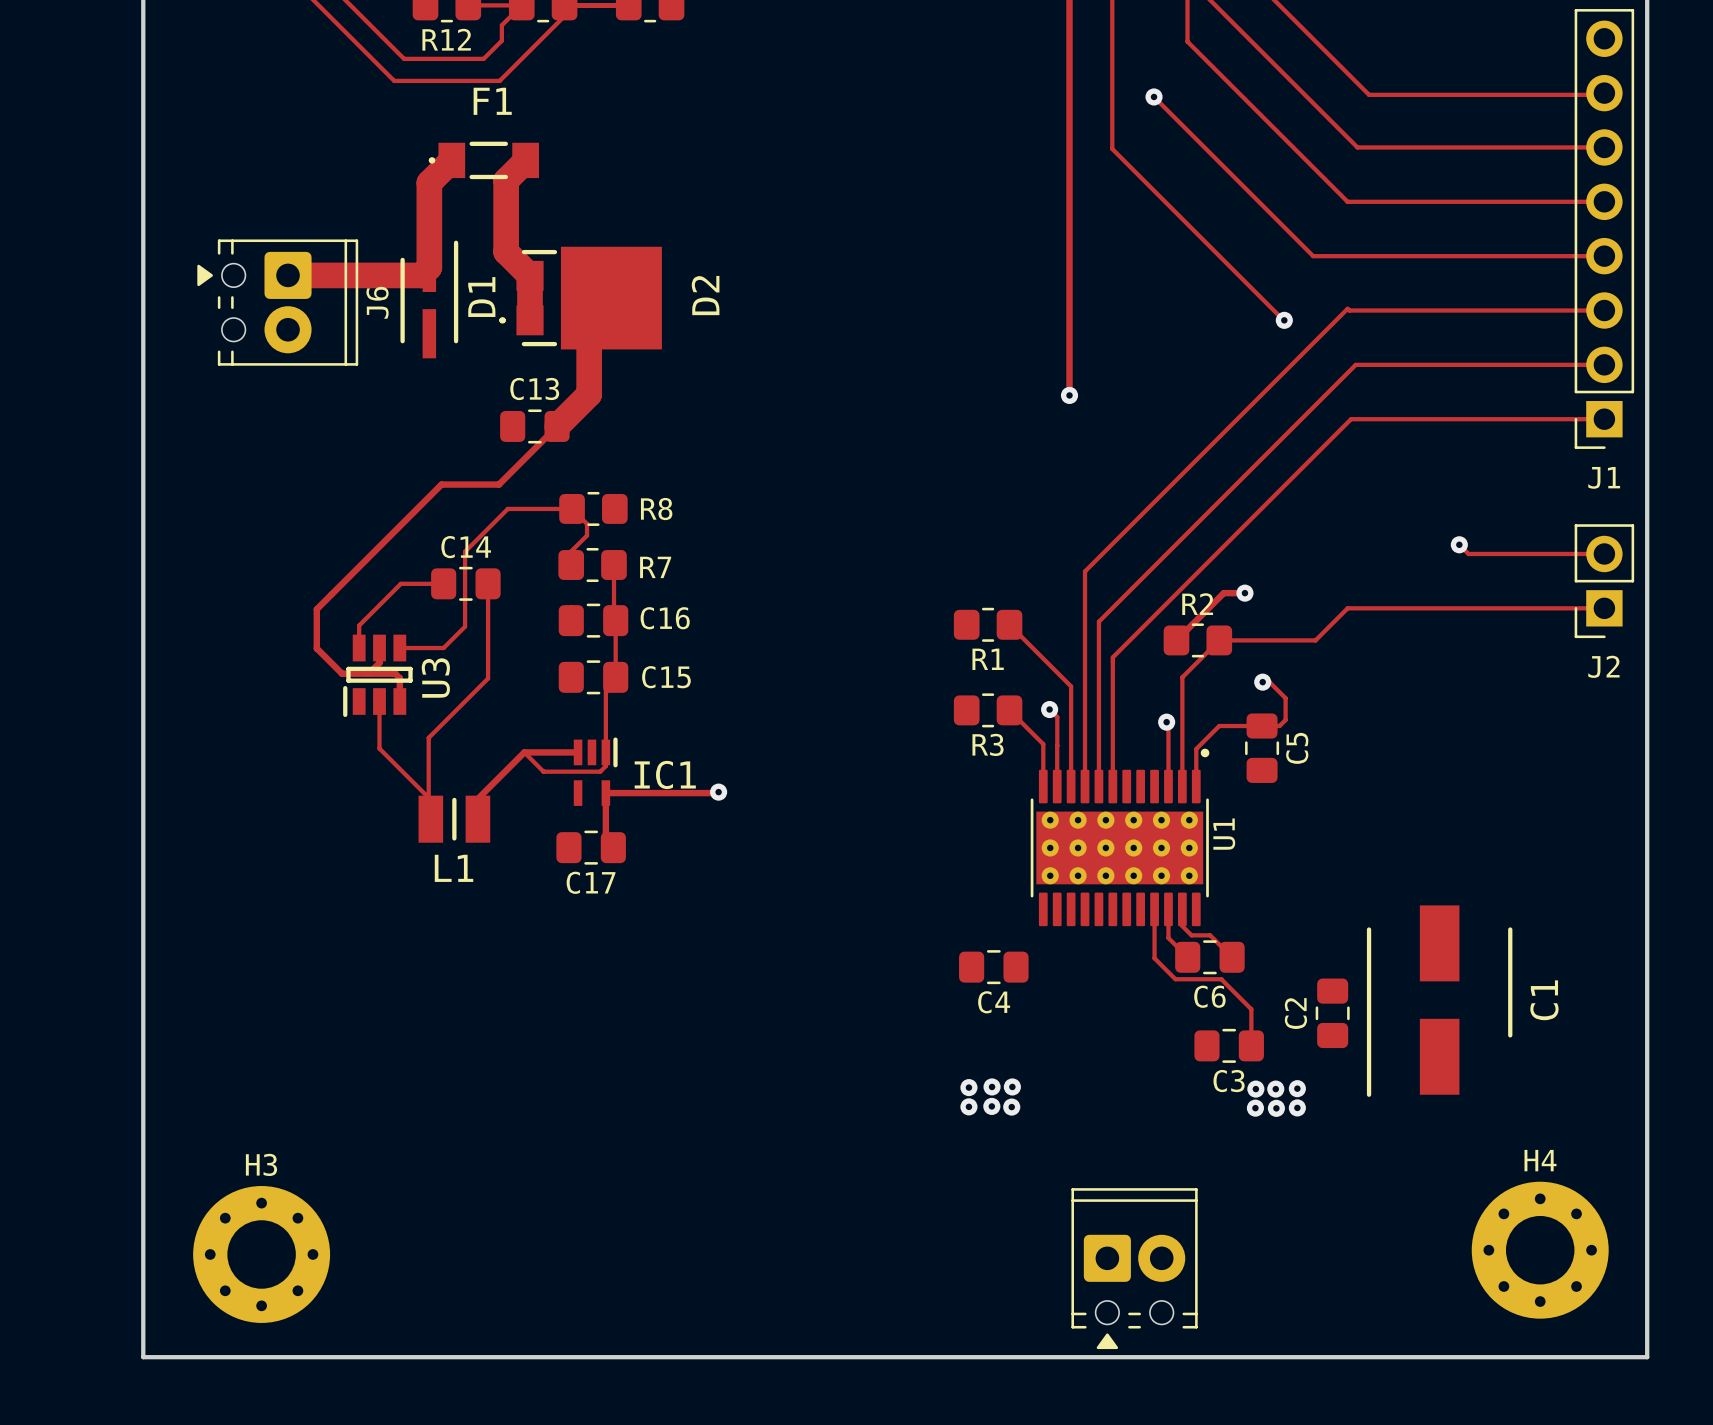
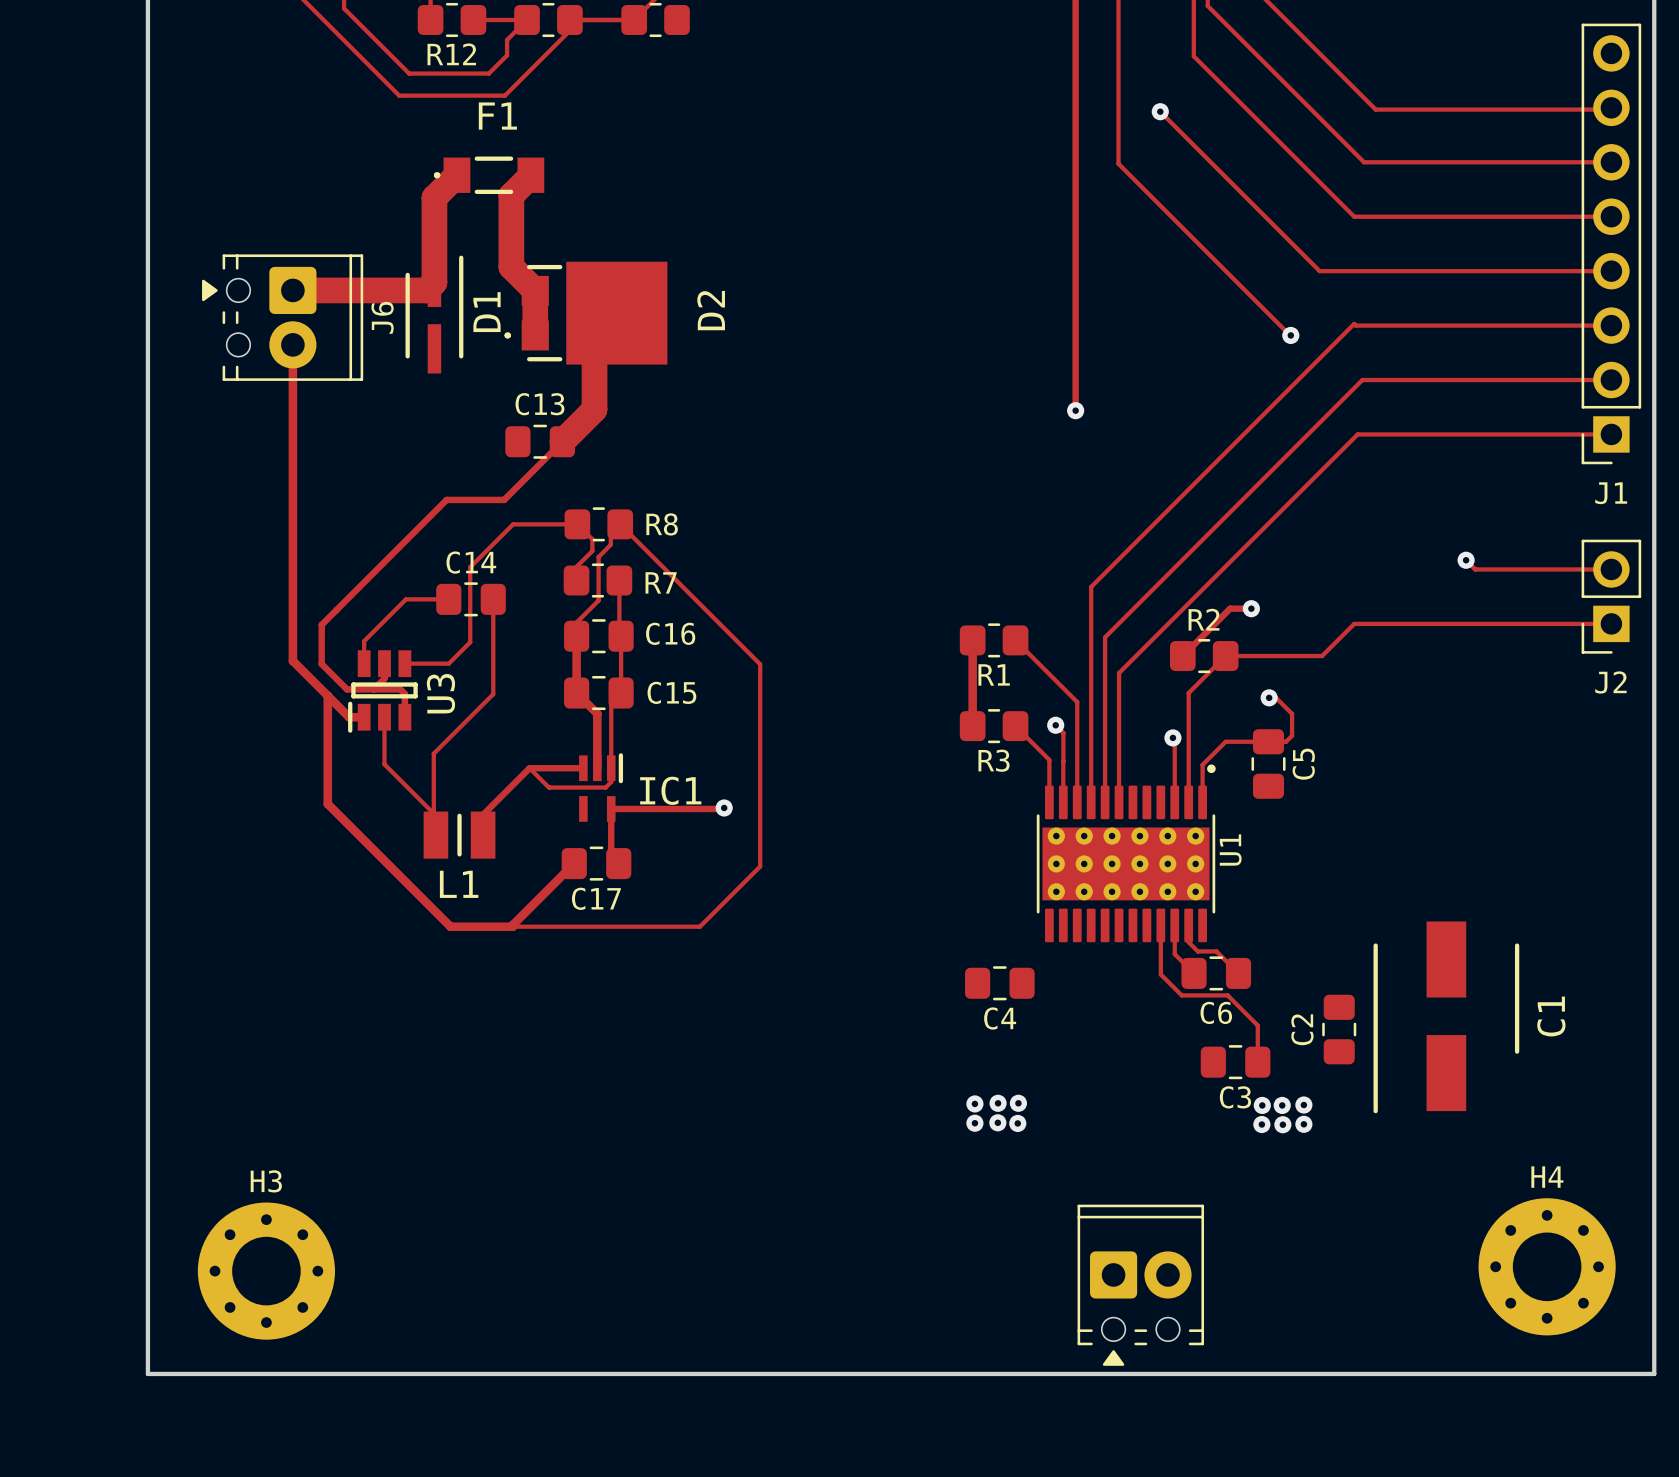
track: none -> (292, 344) (292, 660) (349, 717) (364, 717)
track: none -> (620, 524) (760, 664) (760, 866) (699, 926) (512, 926)
track: none -> (610, 533) (610, 544) (598, 556) (598, 600) (576, 622)
track: none -> (576, 636) (576, 693) (597, 713) (597, 768)
track: none -> (972, 640) (972, 726)
track: none -> (327, 695) (327, 803) (450, 926) (512, 926)
track: none -> (574, 863) (512, 926)

